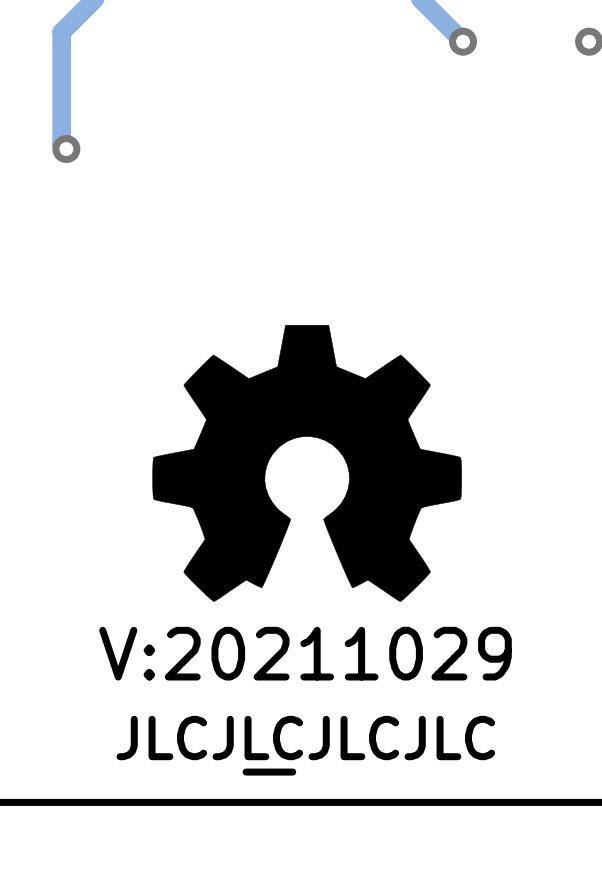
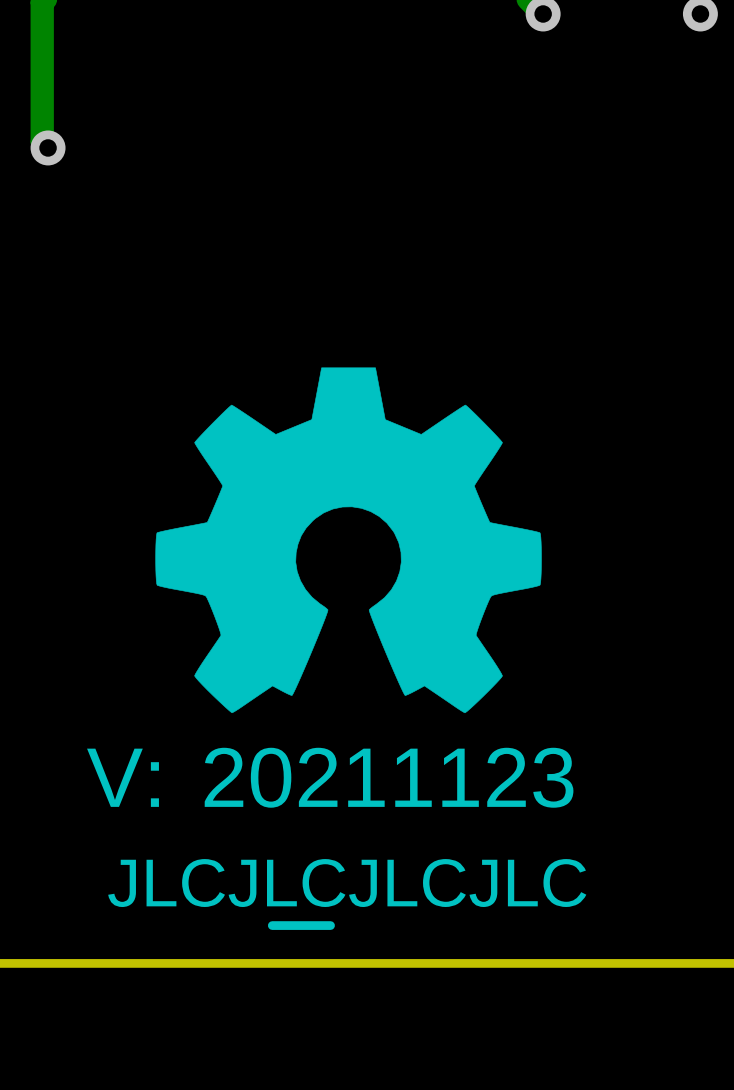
drawing shape: [99, 626, 512, 681] -> [87, 747, 574, 808]

